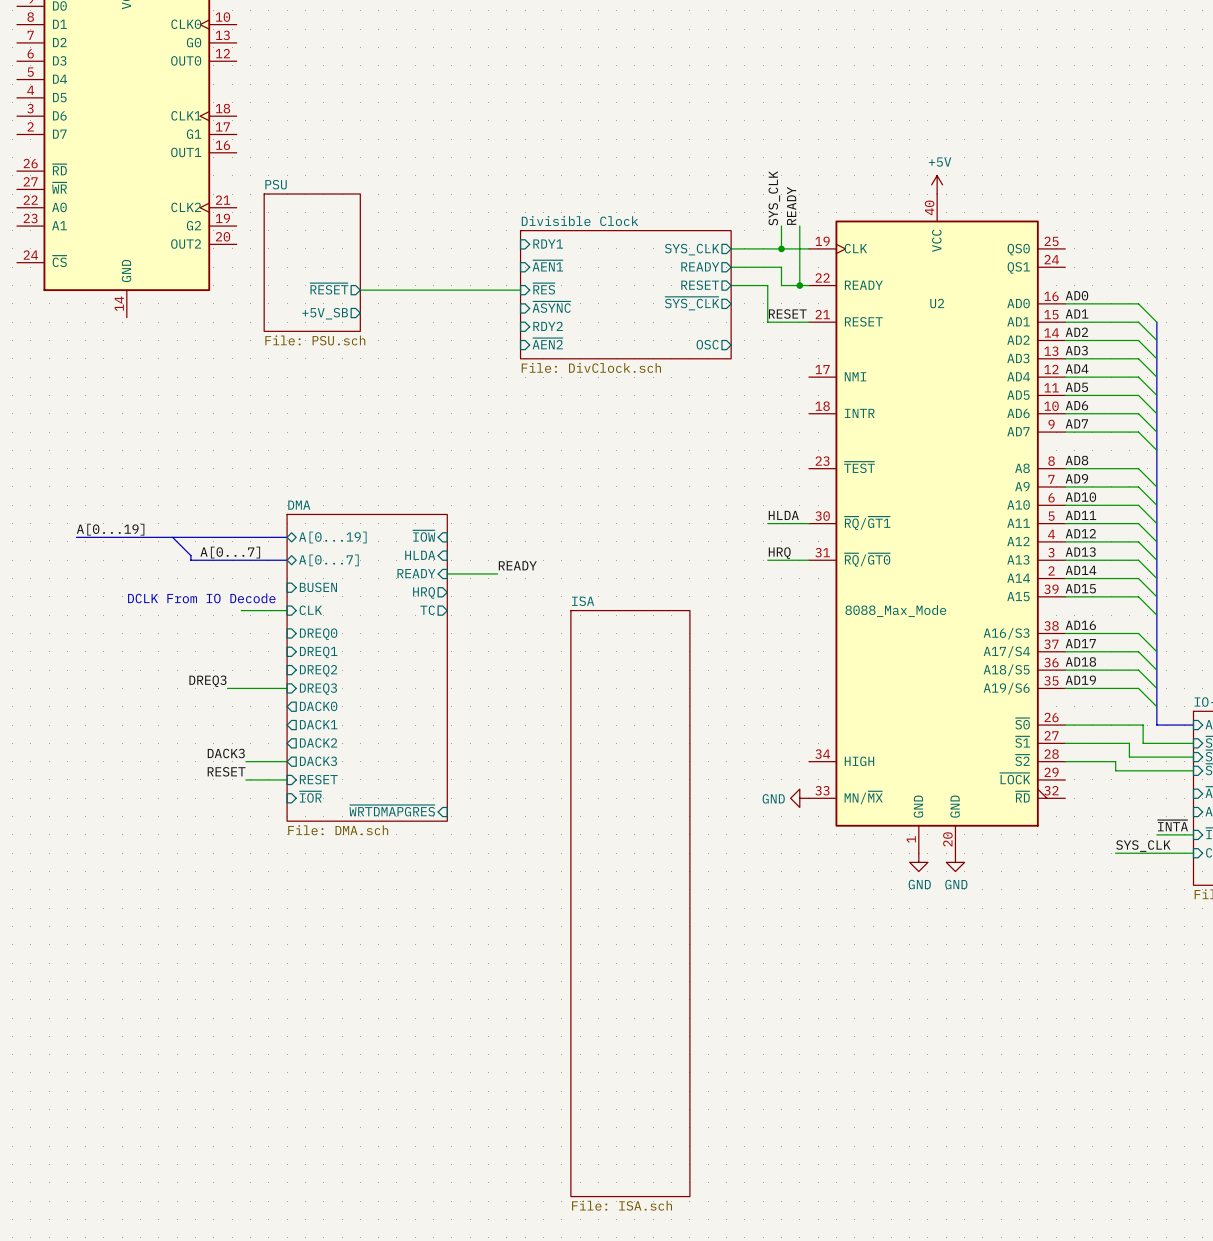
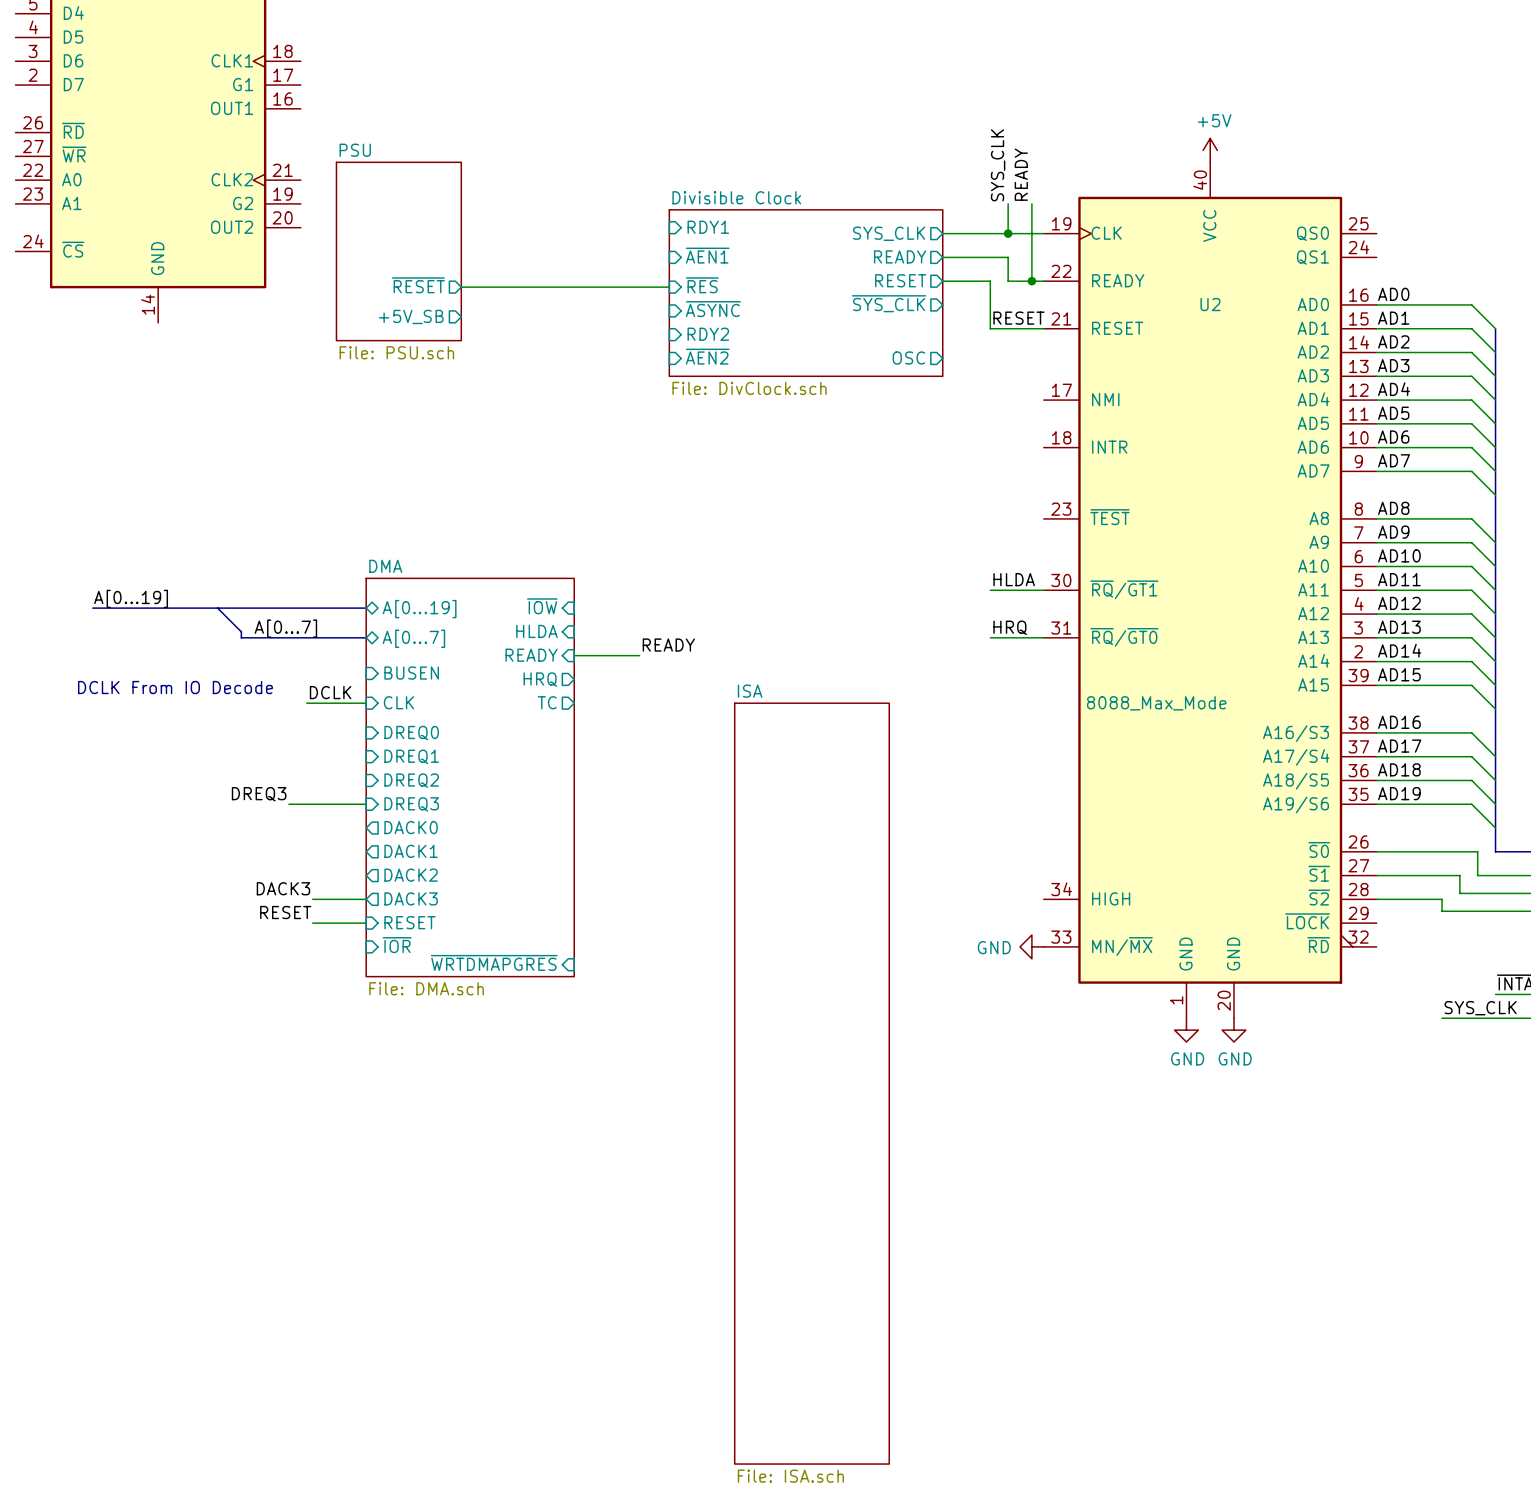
text position: DCLK From IO Decode (201, 598) -> DCLK From IO Decode (175, 687)
label: none -> DCLK (330, 692)

